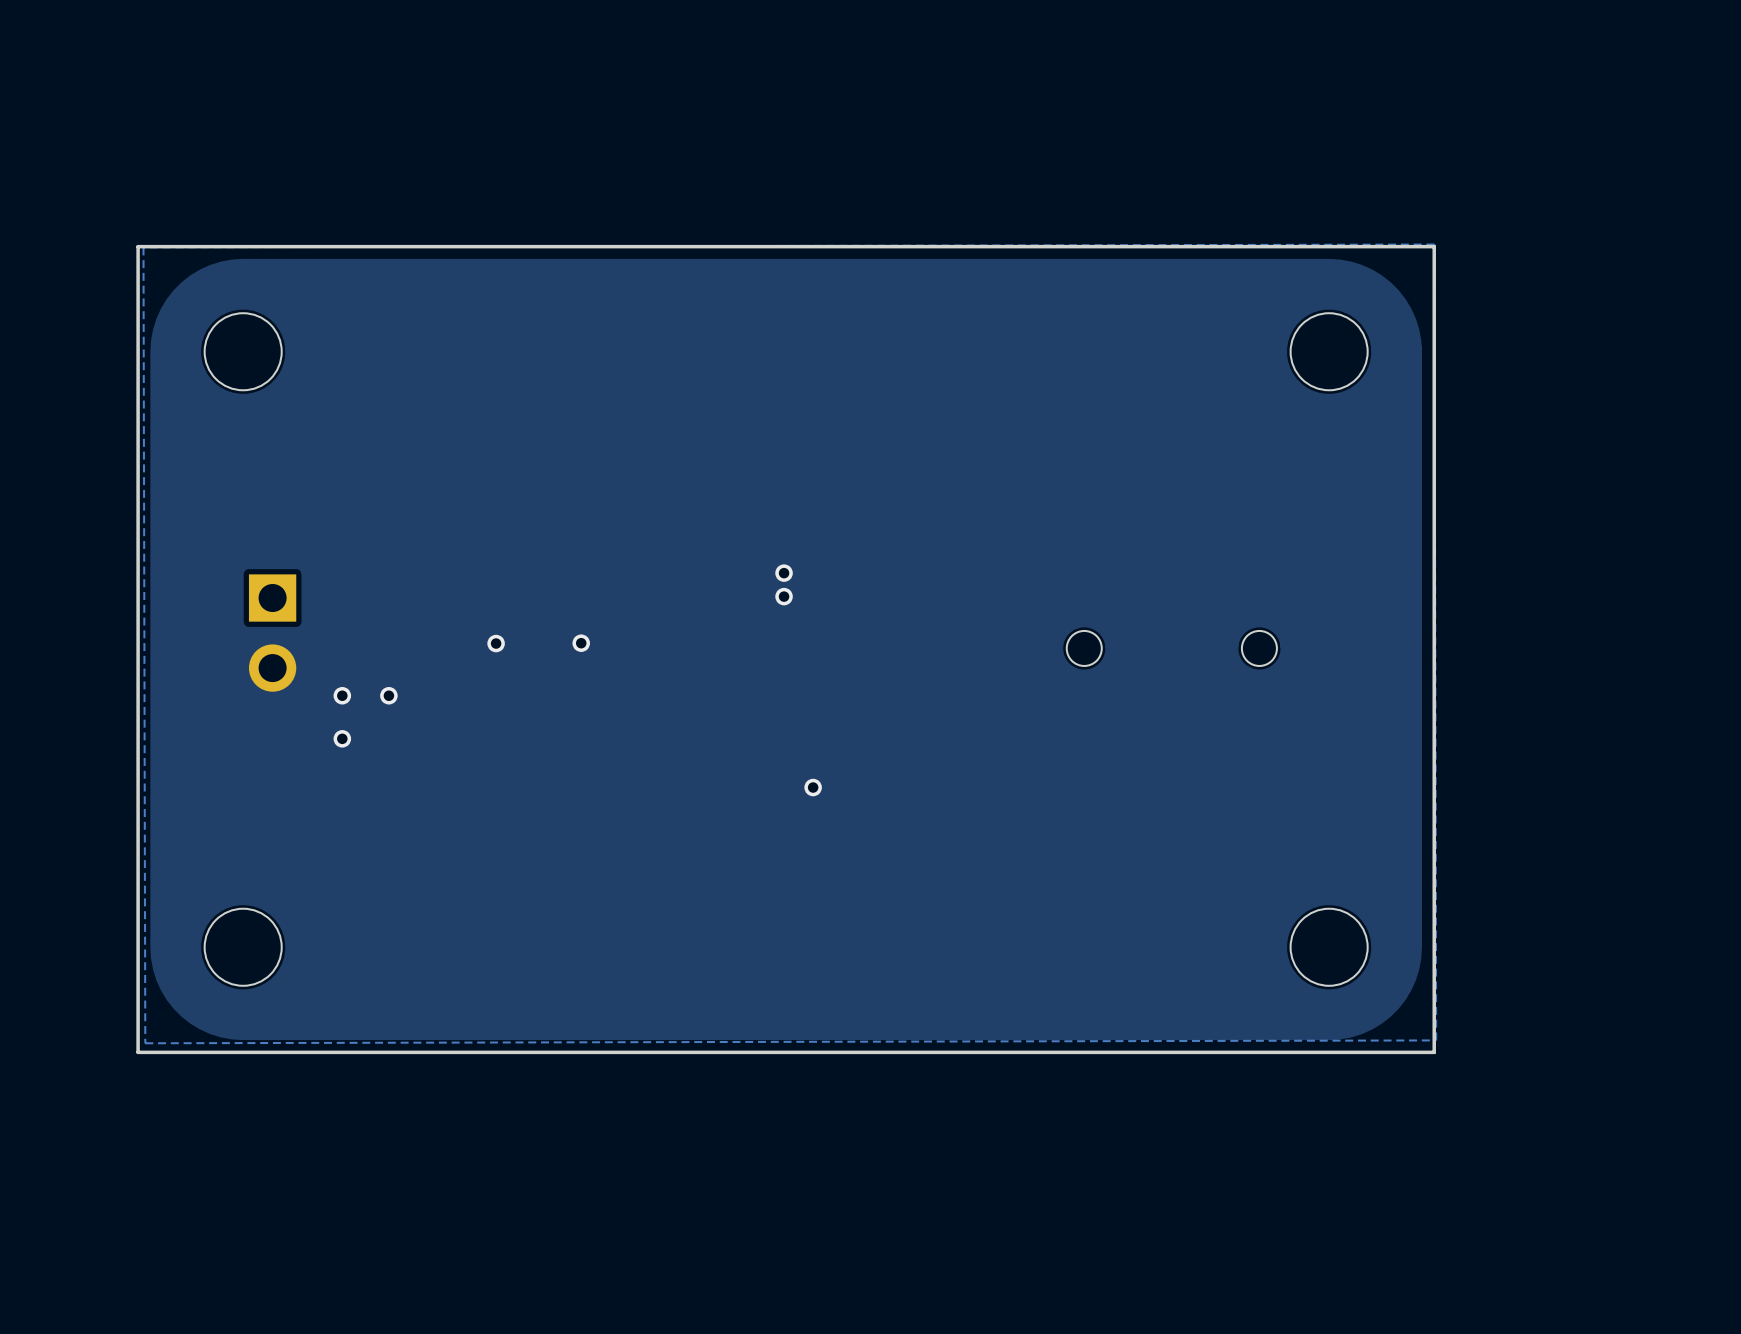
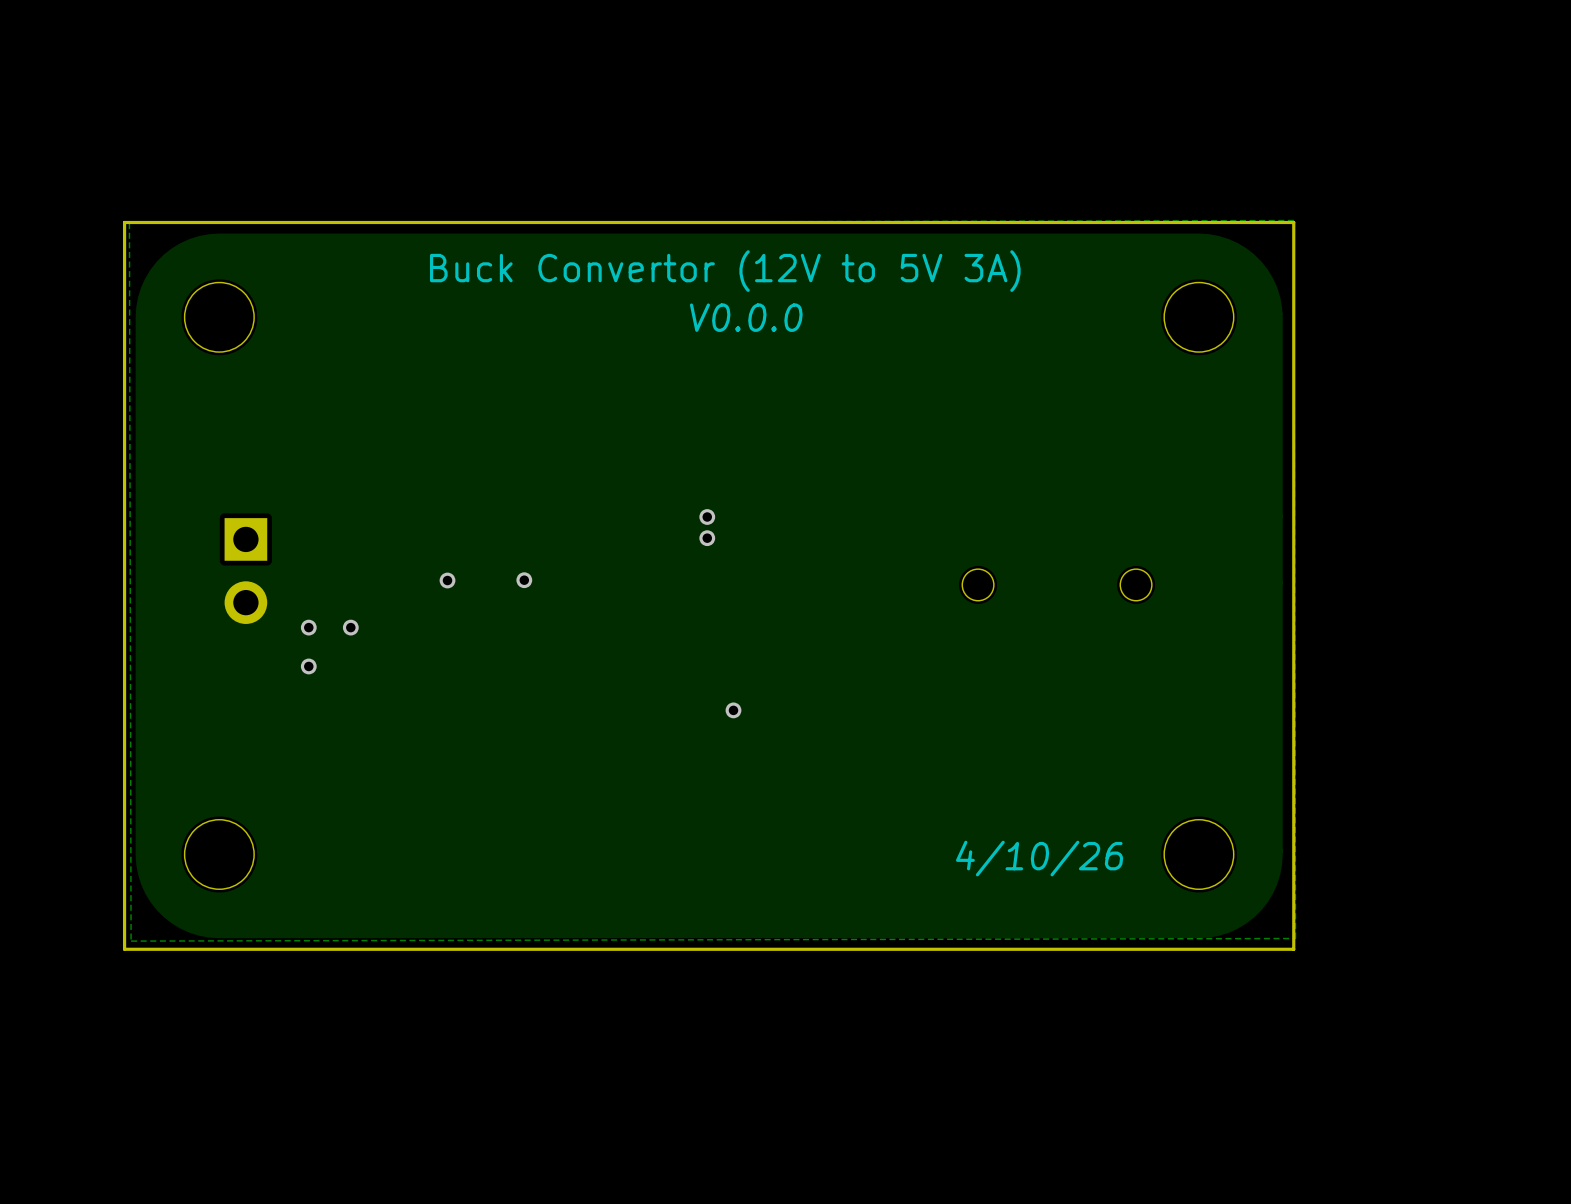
text: none -> Buck Convertor (12V to 5V 3A) (725, 271)
text: none -> V0.0.0 (746, 317)
text: none -> 4/10/26 (1039, 858)

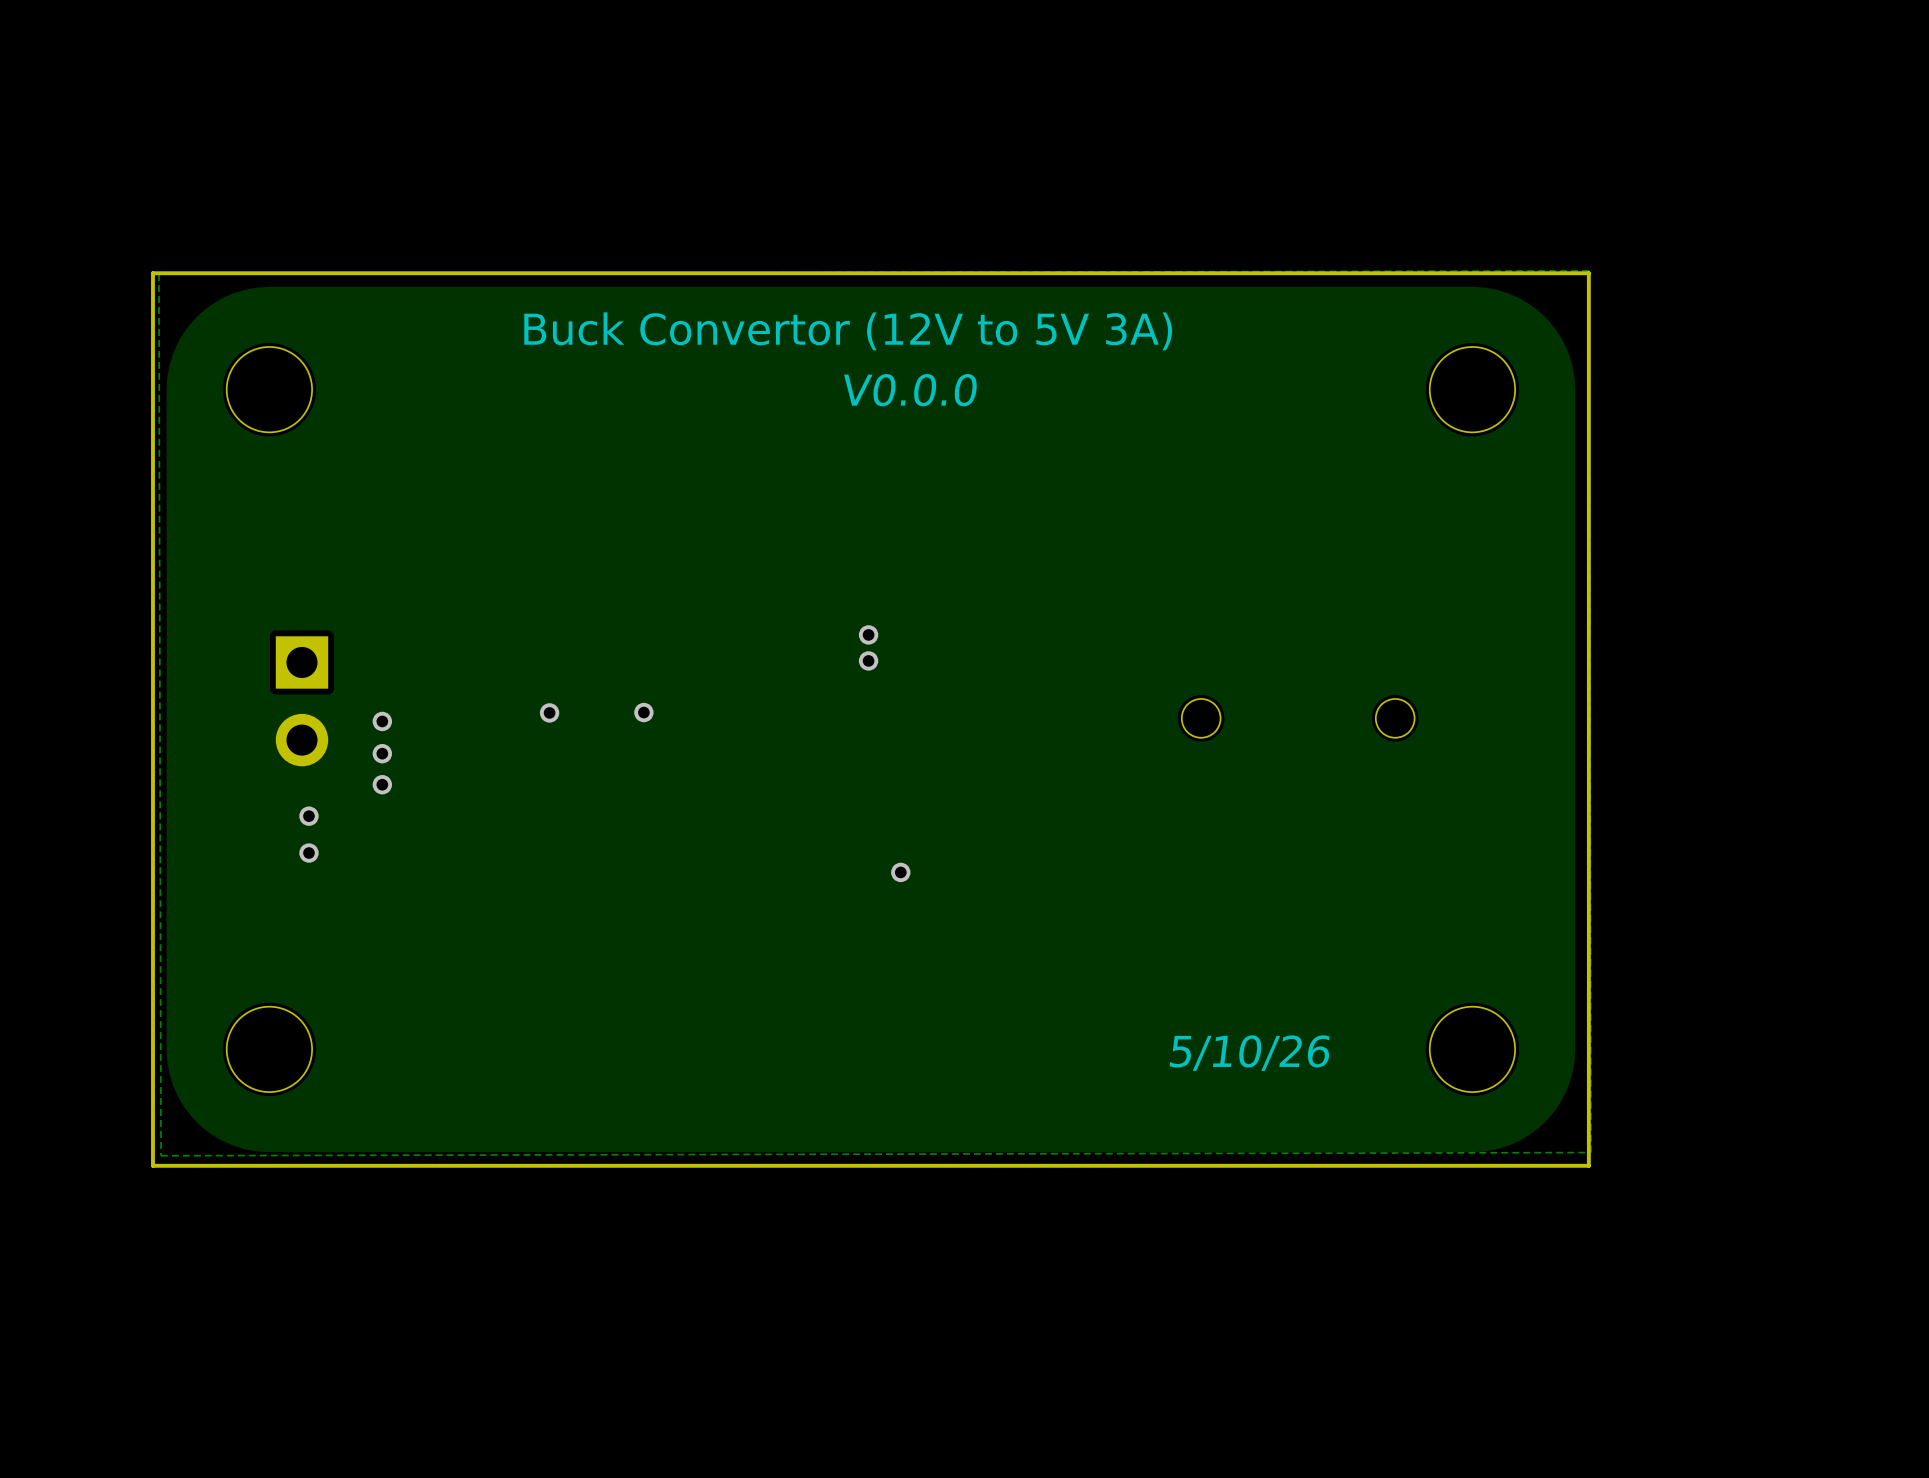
via: none -> (382, 721)
via: none -> (382, 753)
via: (308, 627) -> none
via: (350, 627) -> none
via: none -> (382, 784)
via: none -> (308, 816)
via: (308, 666) -> none
via: none -> (308, 853)
text: 4/10/26 (1039, 858) -> 5/10/26 (1249, 1053)

